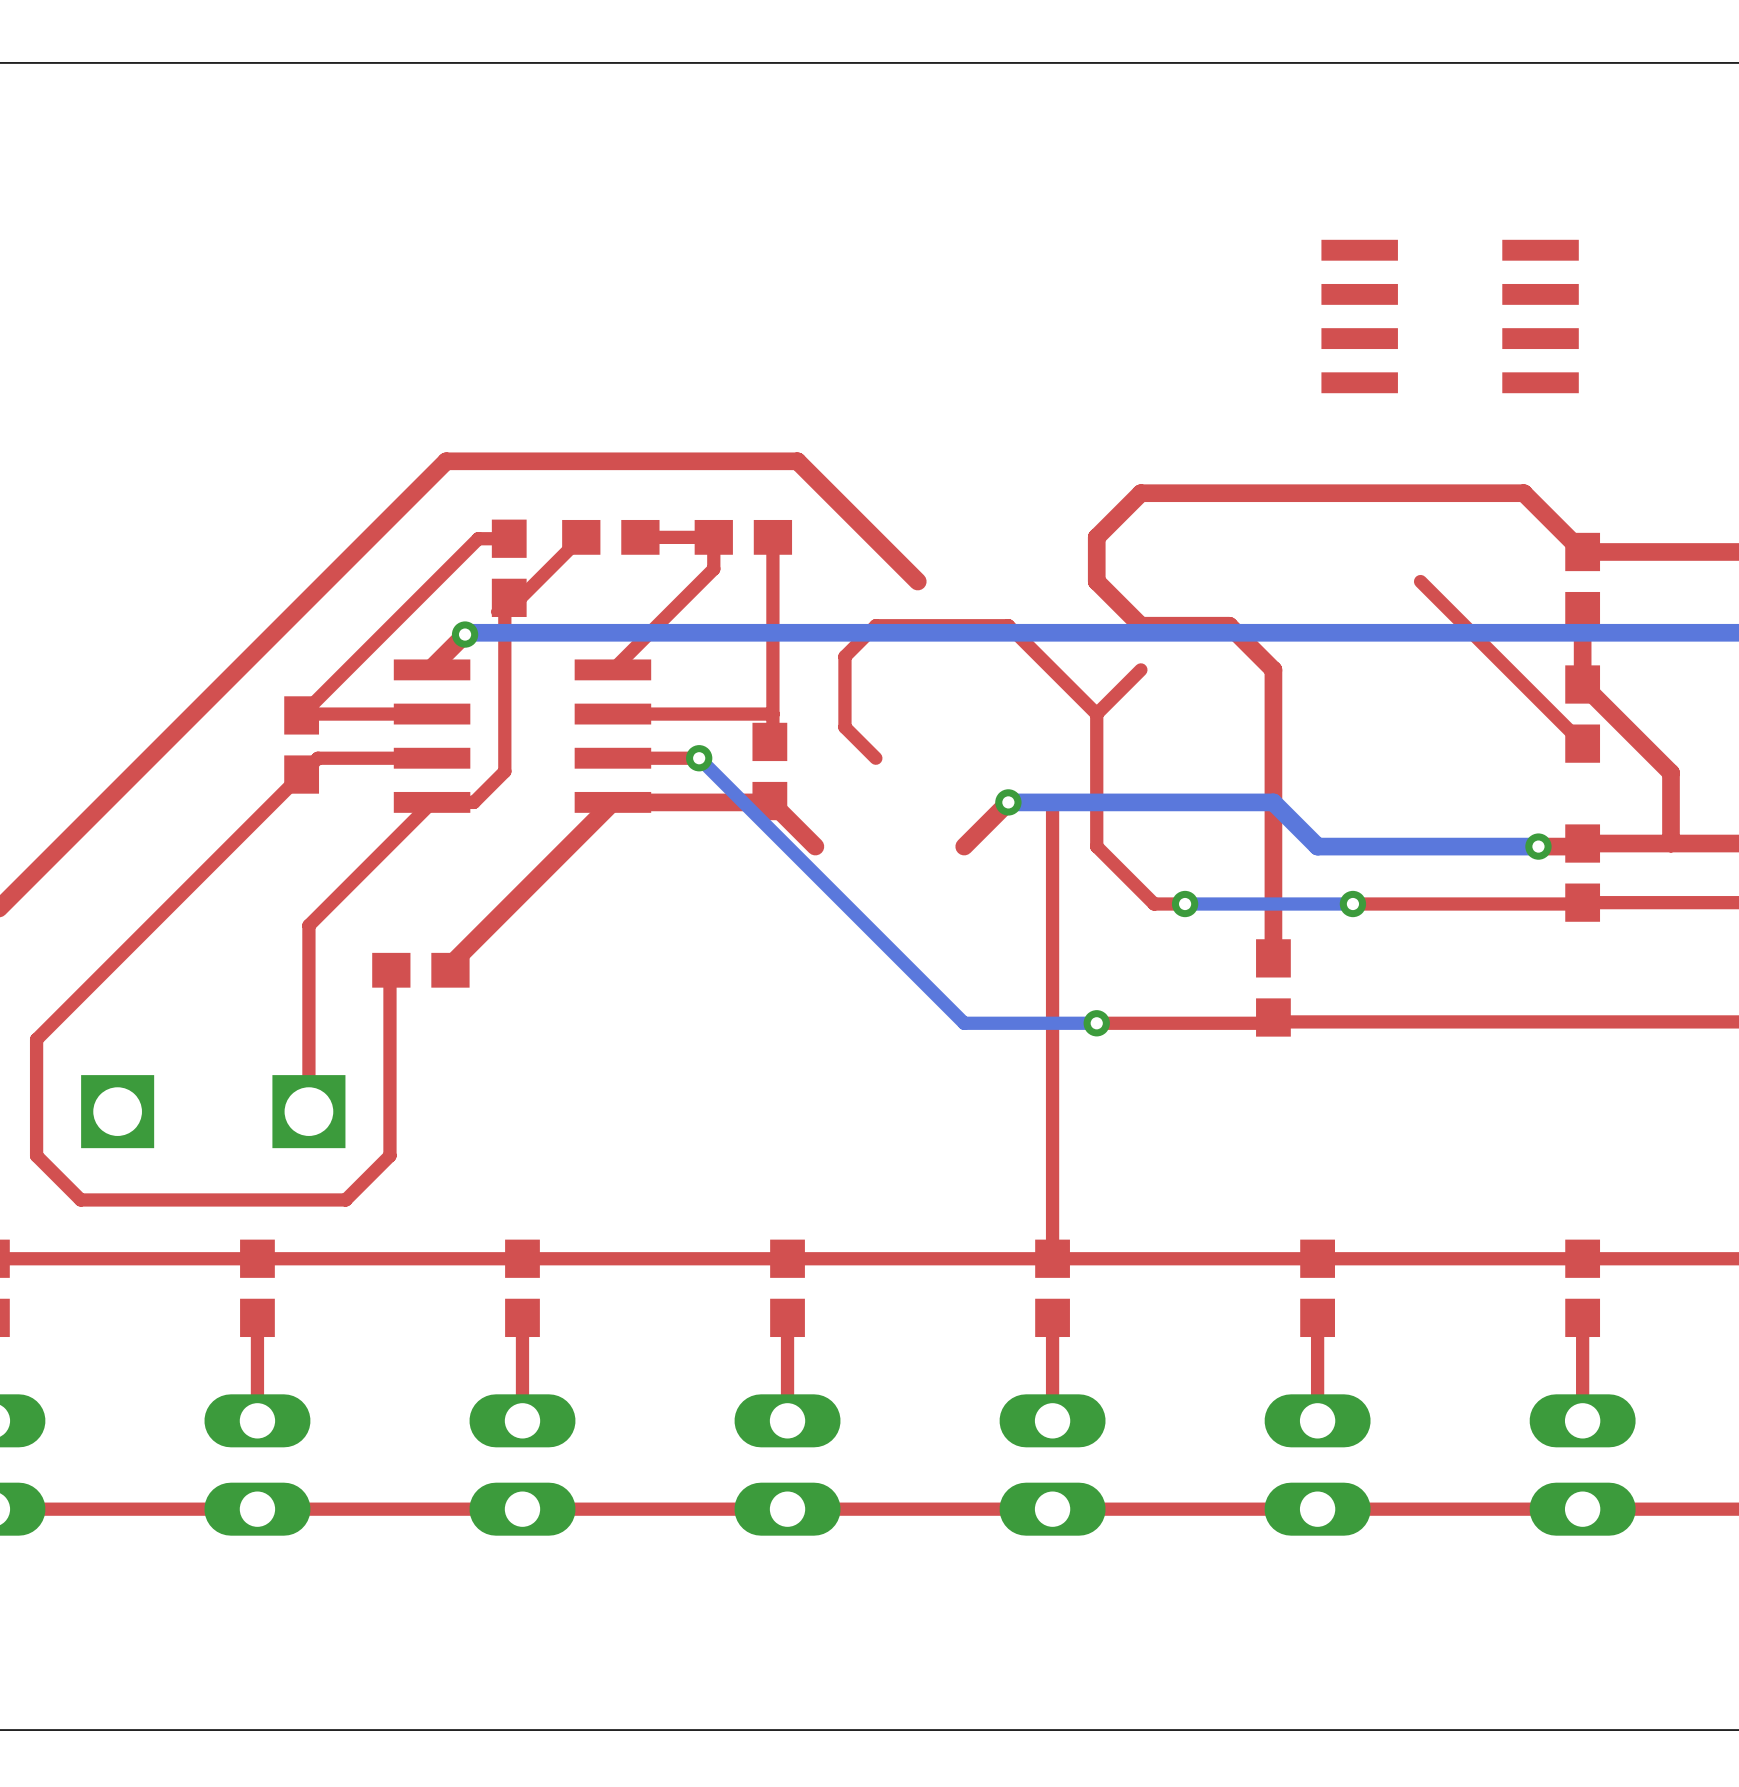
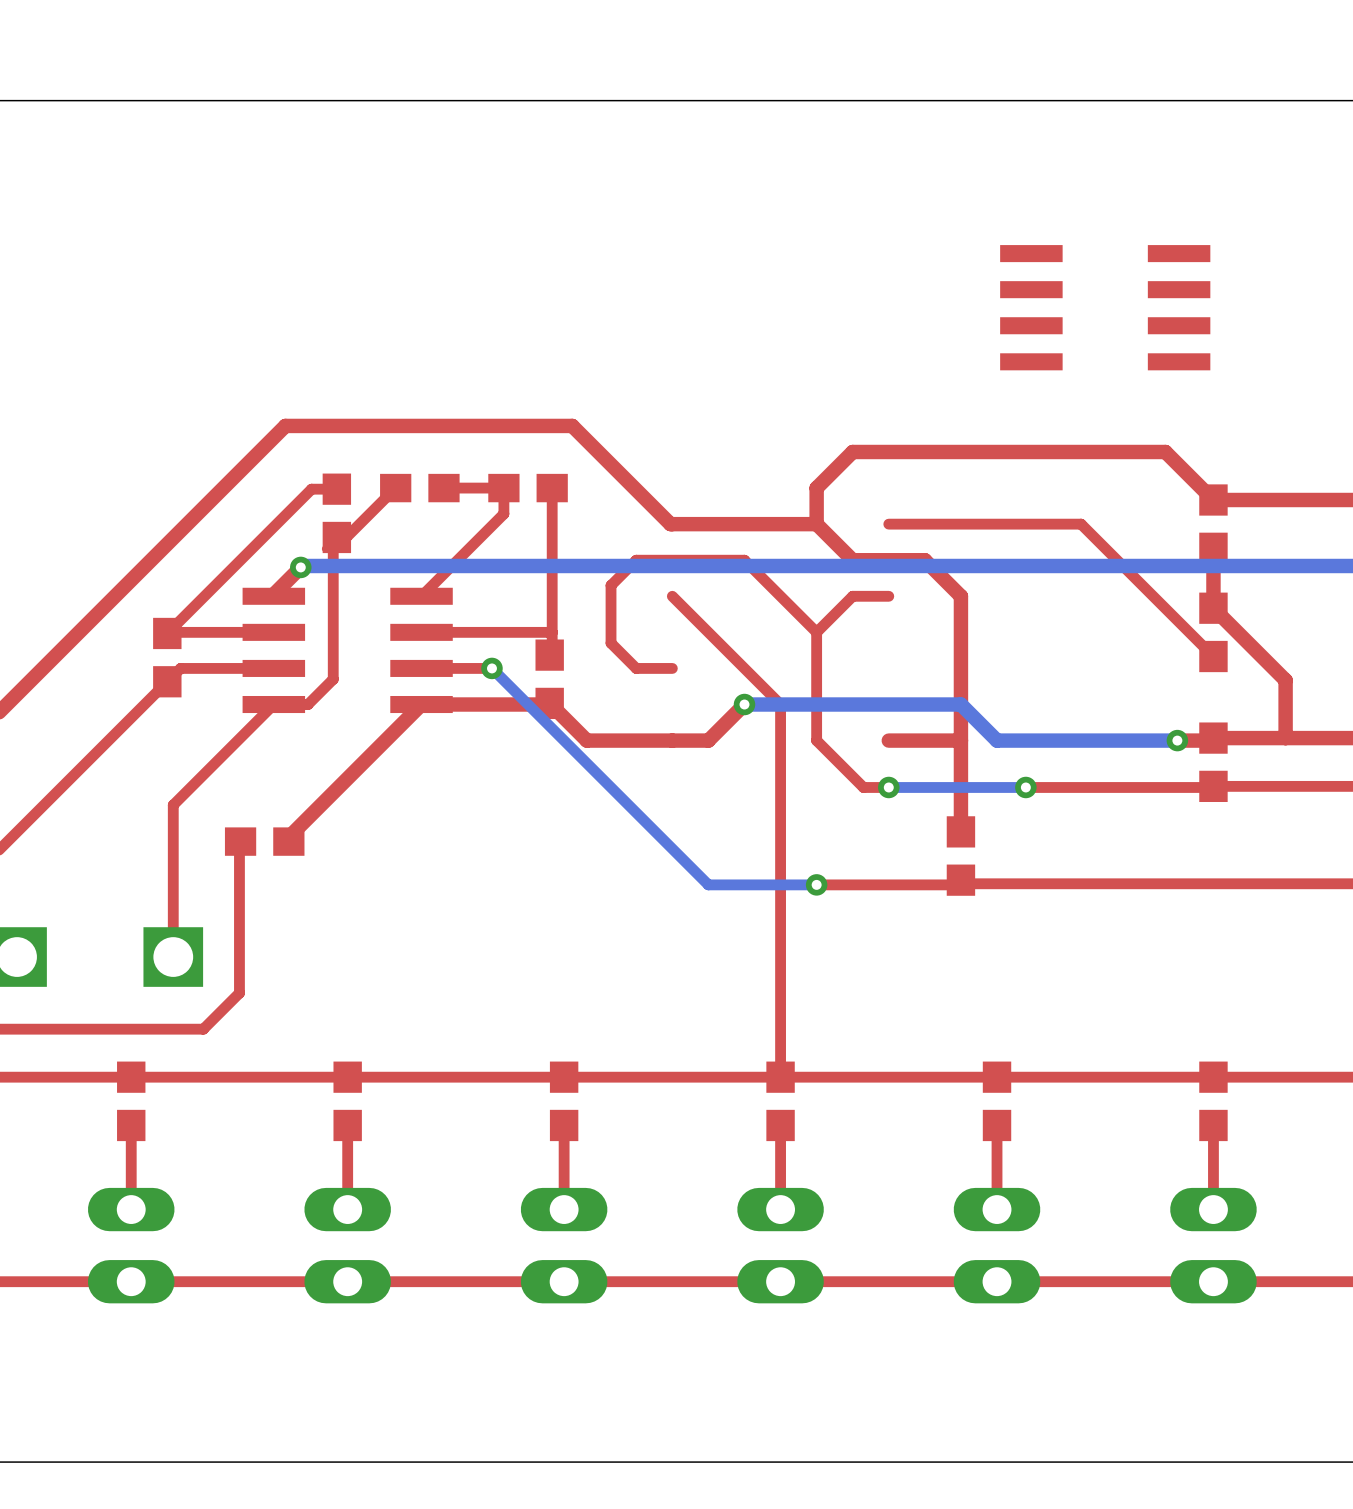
top track: none -> (816, 524) (670, 524)
top track: none -> (1081, 524) (888, 524)
top track: none -> (672, 596) (780, 704)
top track: none -> (888, 596) (852, 596)
top track: none -> (672, 668) (636, 668)
top track: none -> (708, 740) (586, 740)
top track: none -> (960, 740) (888, 740)

